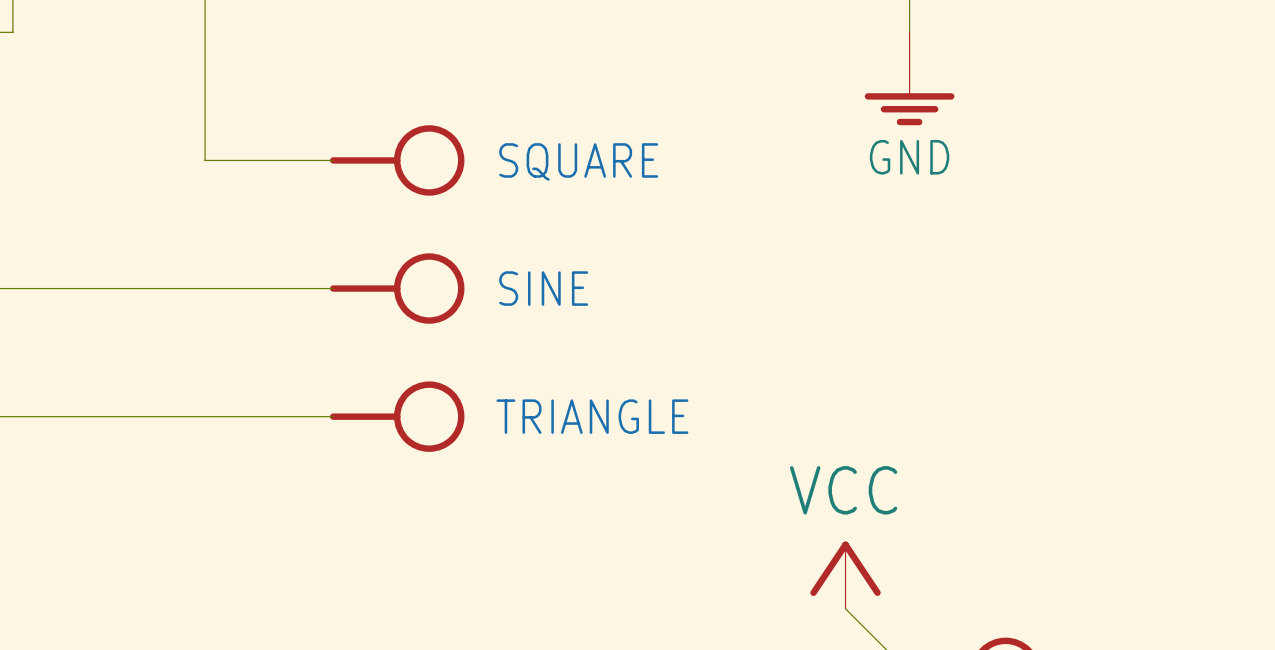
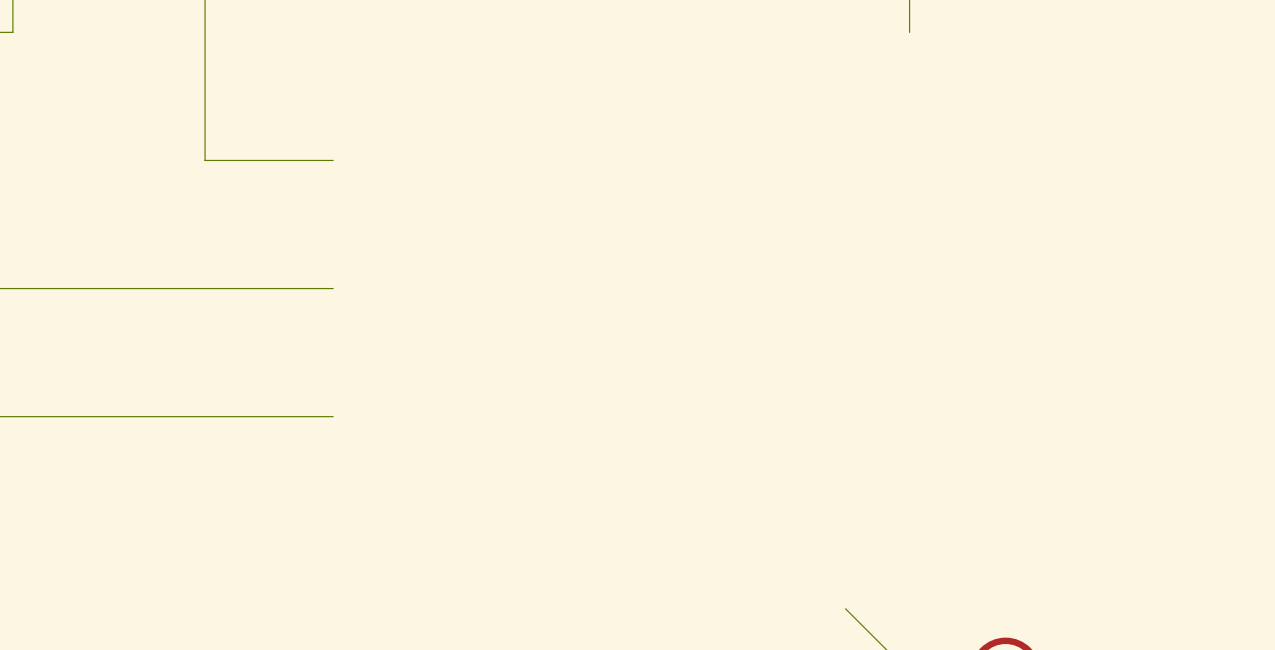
power symbol: GND (909, 78) -> none
SQUARE: (397, 160) -> none
SINE: (397, 288) -> none
TRIANGLE: (397, 416) -> none
power symbol: VCC (845, 575) -> none

